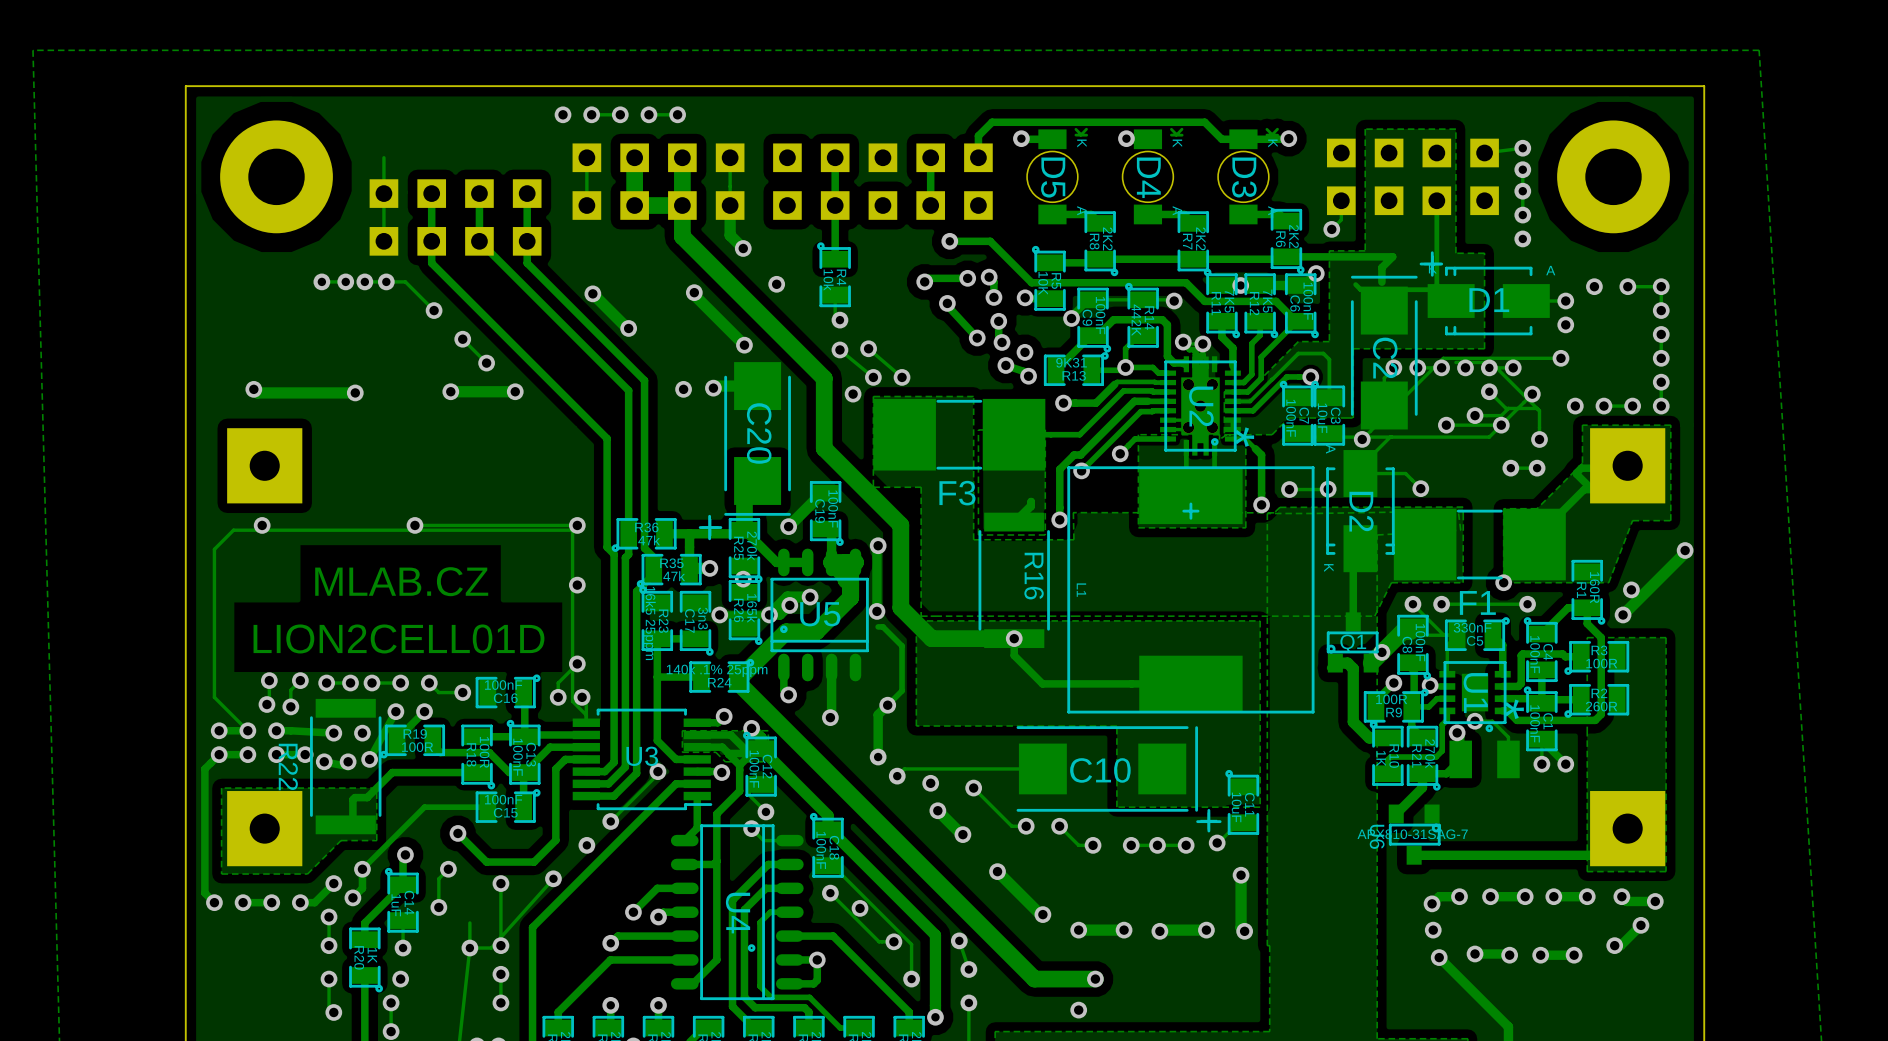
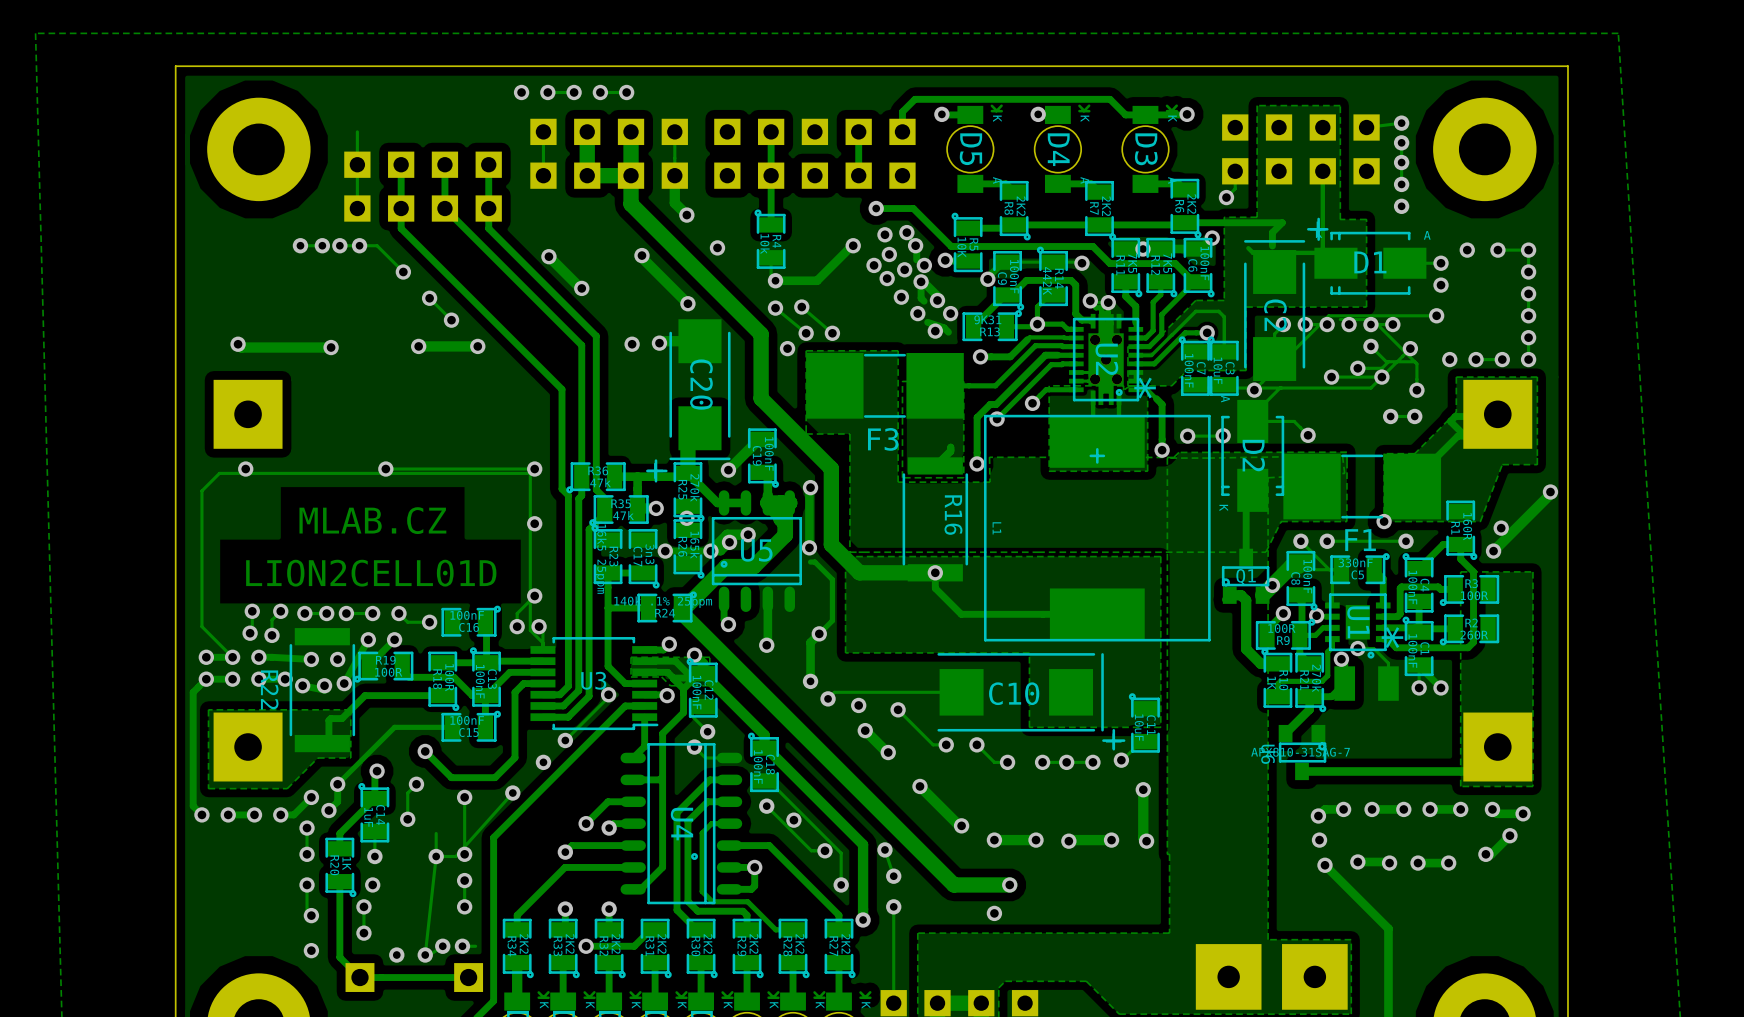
via: none -> (906, 232)
via: none -> (884, 234)
via: (989, 277) -> none
track: (967, 278) (928, 278) (924, 281) -> none
via: (967, 278) -> none
track: none -> (854, 243) (817, 280) (775, 280)
via: none -> (915, 245)
via: none -> (889, 254)
via: (993, 297) -> none
track: (947, 303) (947, 305) (977, 338) -> none
via: none -> (924, 265)
via: none -> (904, 269)
via: none -> (887, 278)
track: none -> (926, 285) (937, 296) (937, 300)
via: none -> (937, 300)
via: (1002, 342) -> none
via: (1024, 352) -> none
via: none -> (917, 313)
via: none -> (950, 313)
via: (1005, 365) -> none
via: none -> (935, 331)
via: (1028, 376) -> none

